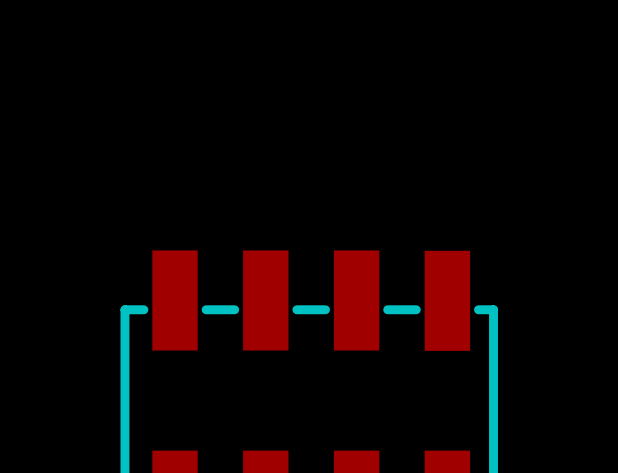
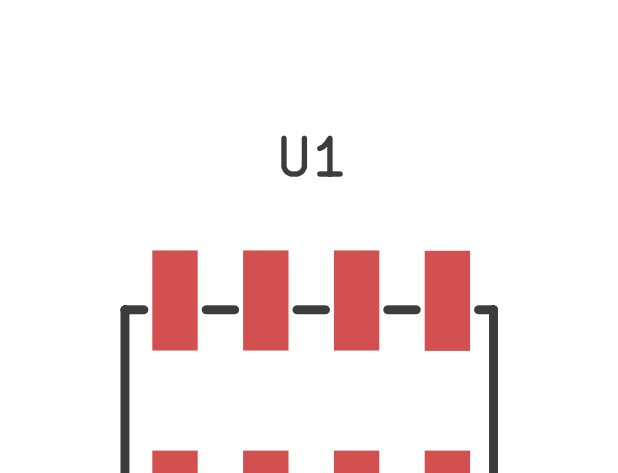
U1 name: none -> U1 (312, 156)

